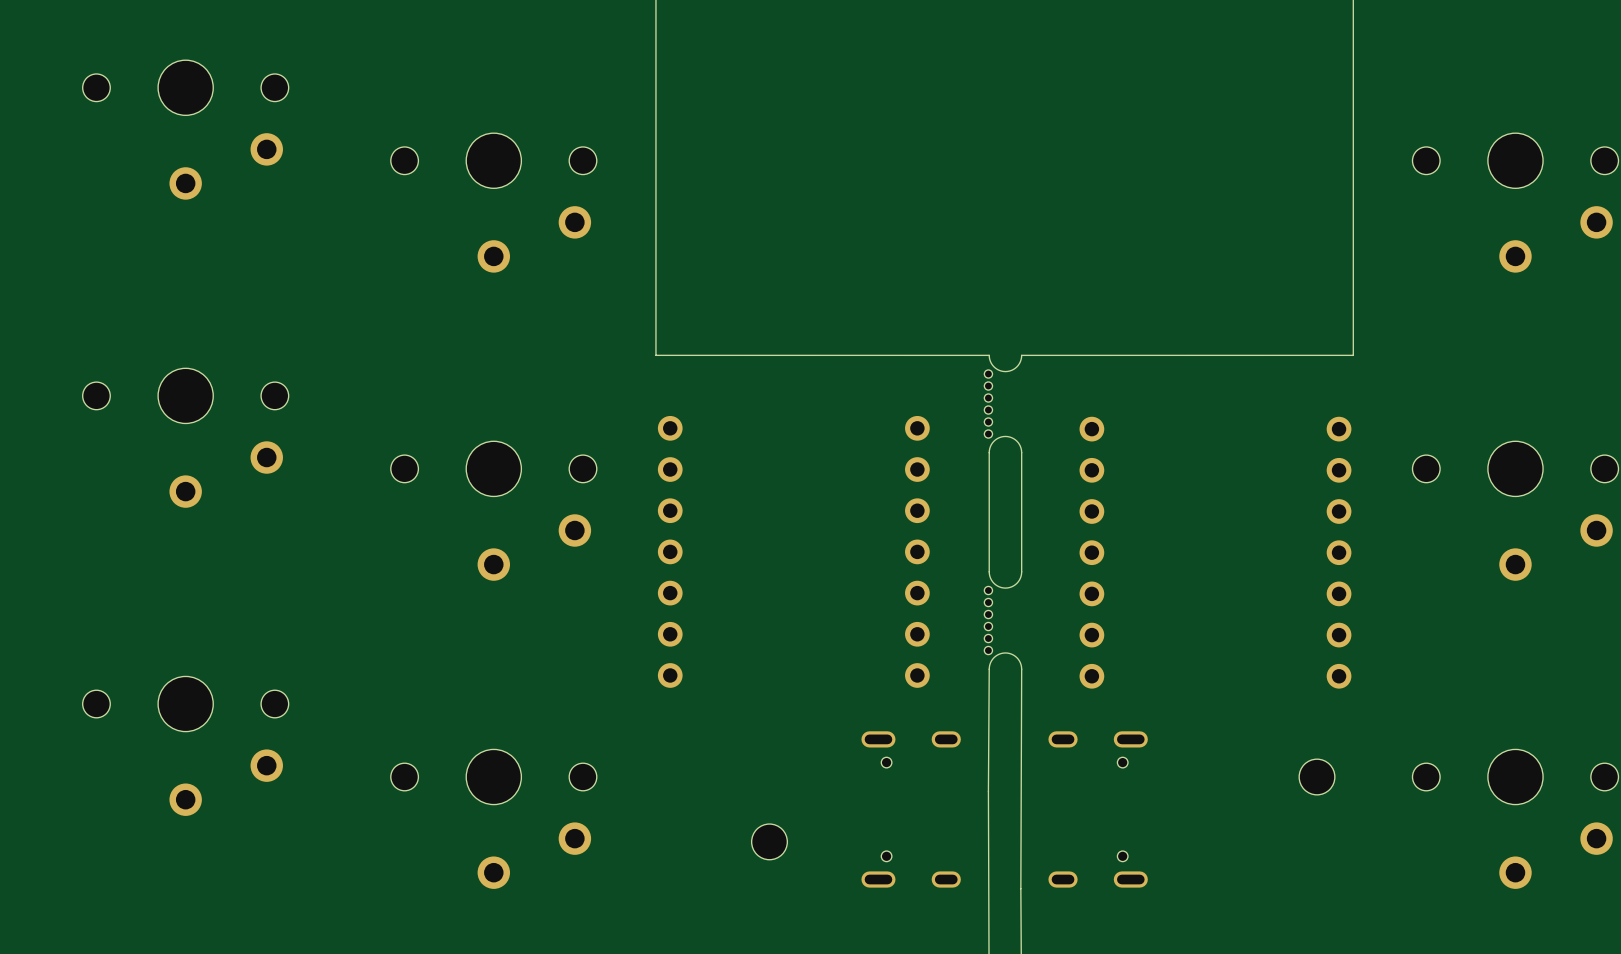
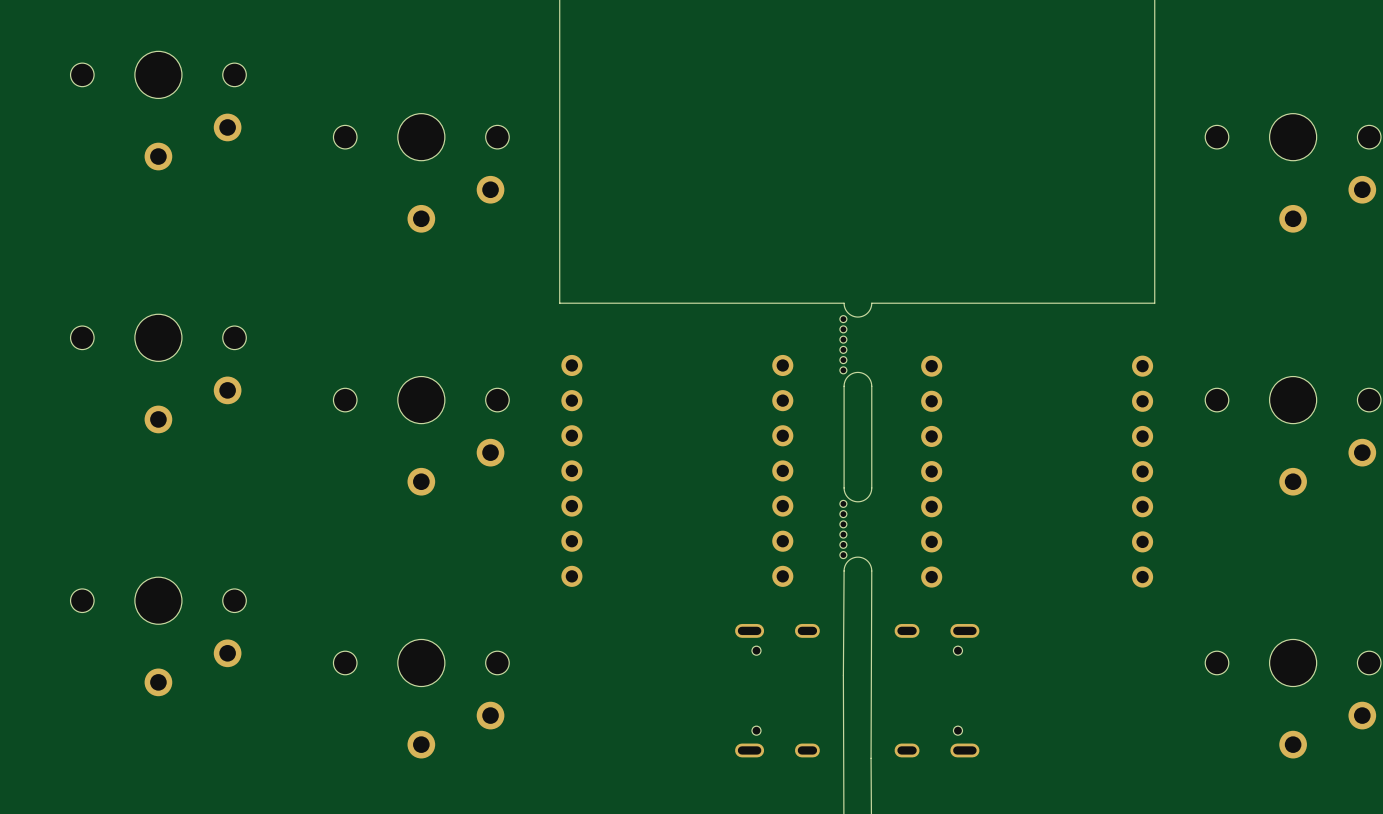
part: (1317, 777) -> none
part: (769, 841) -> none

